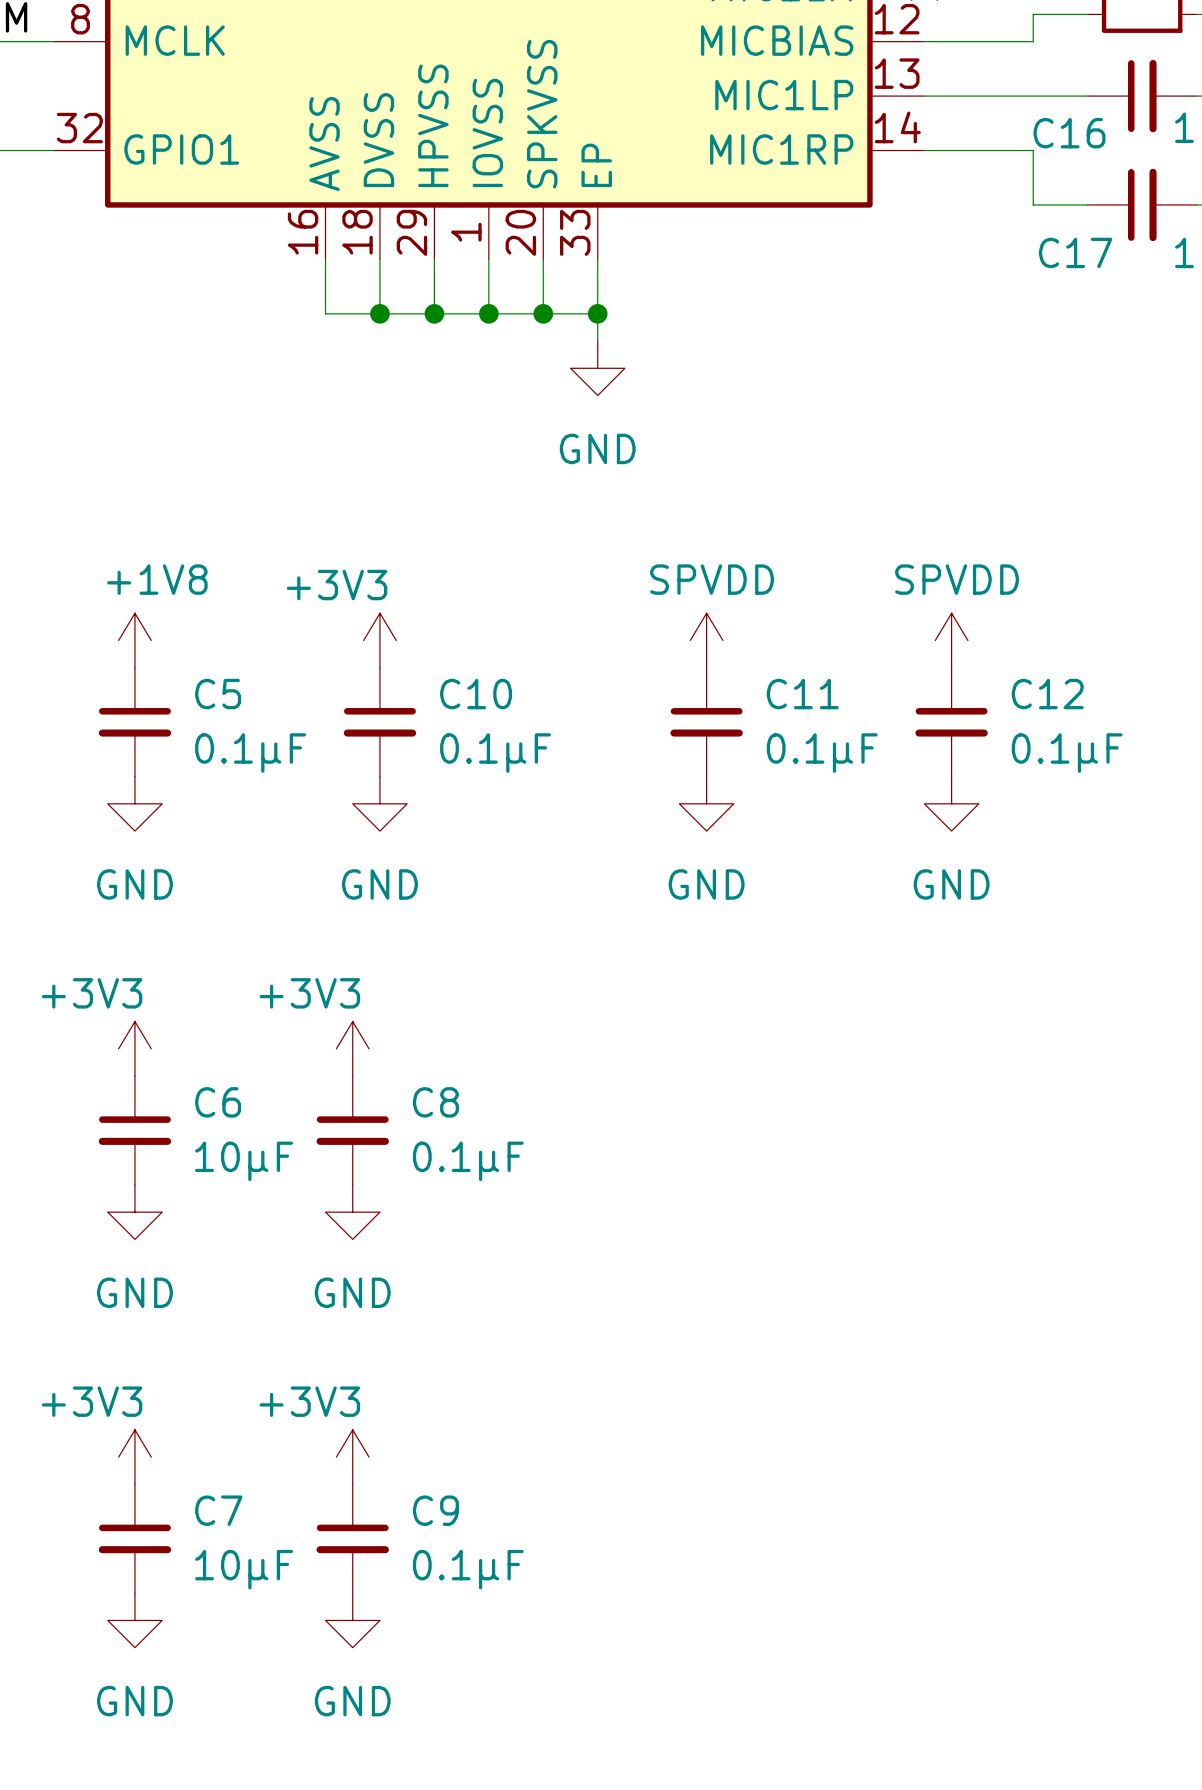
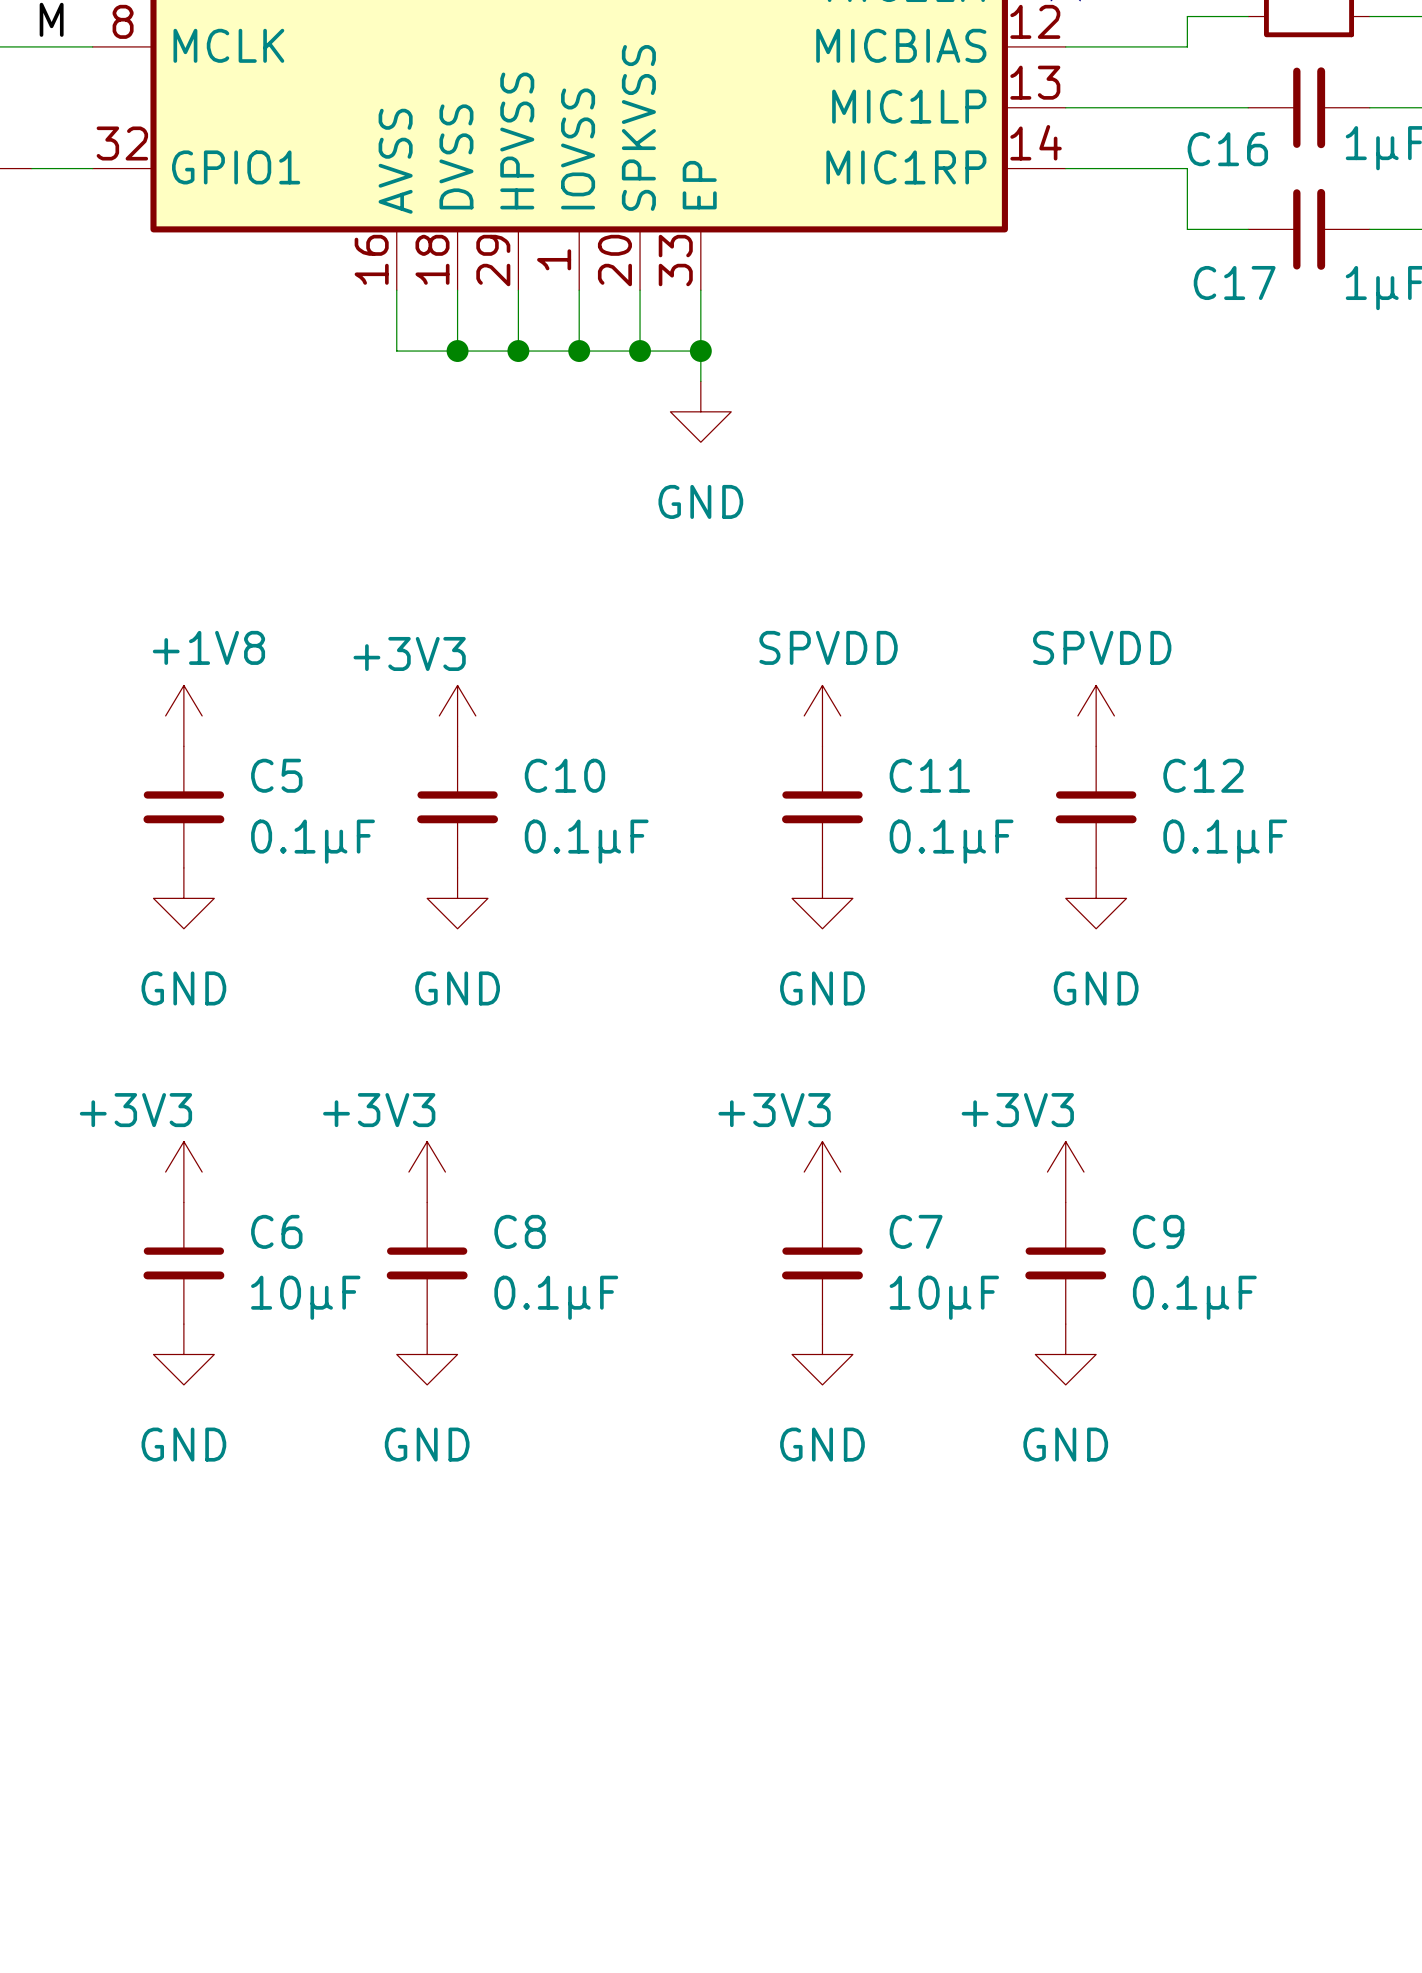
power symbol: none -> +3V3 (822, 1172)
power symbol: none -> +3V3 (1065, 1172)
power symbol: none -> GND (822, 1354)
power symbol: none -> GND (1065, 1354)
power symbol: +3V3 (134, 1457) -> none
power symbol: +3V3 (352, 1457) -> none
C7 position: (134, 1538) -> (822, 1263)
C9 position: (352, 1538) -> (1065, 1263)
power symbol: GND (134, 1620) -> none
power symbol: GND (352, 1620) -> none

